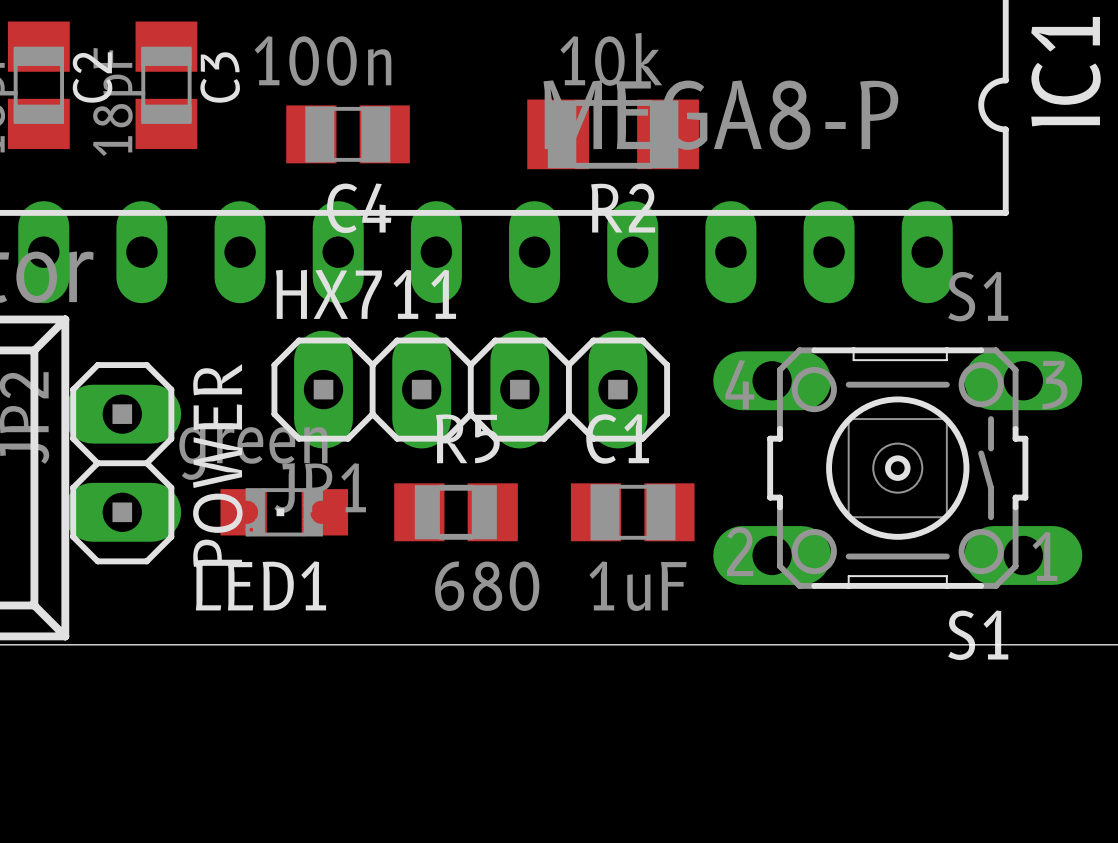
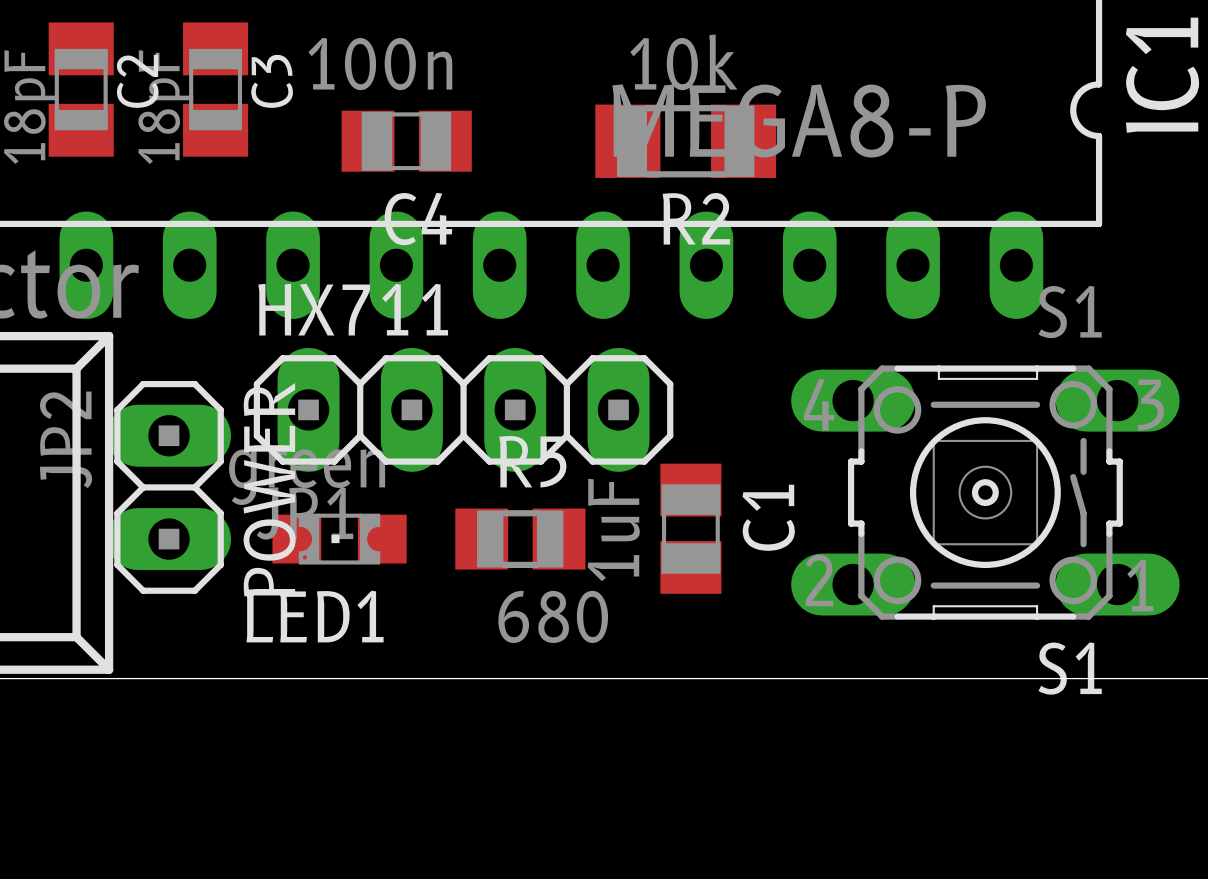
HX711 position: (470, 389) -> (463, 409)
C1 rotation: 0° (632, 512) -> 90° clockwise (690, 528)

